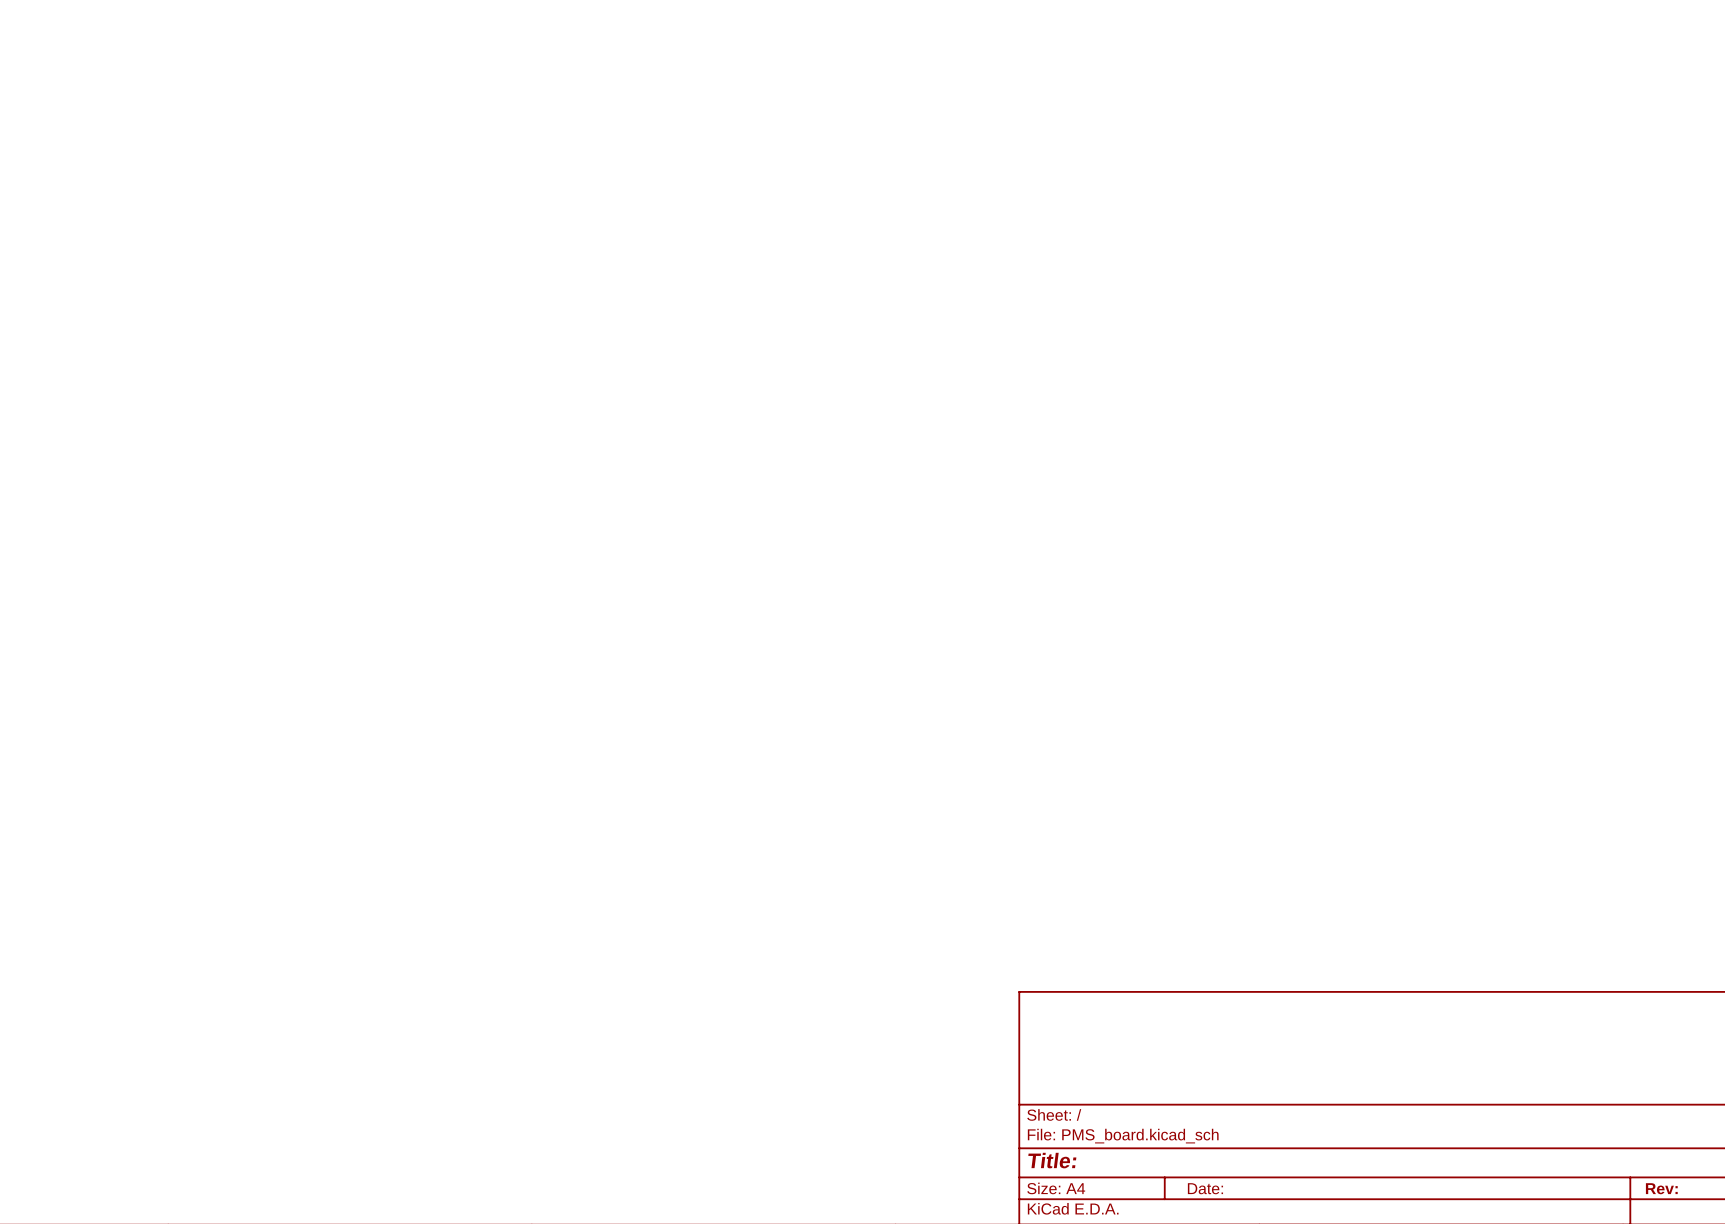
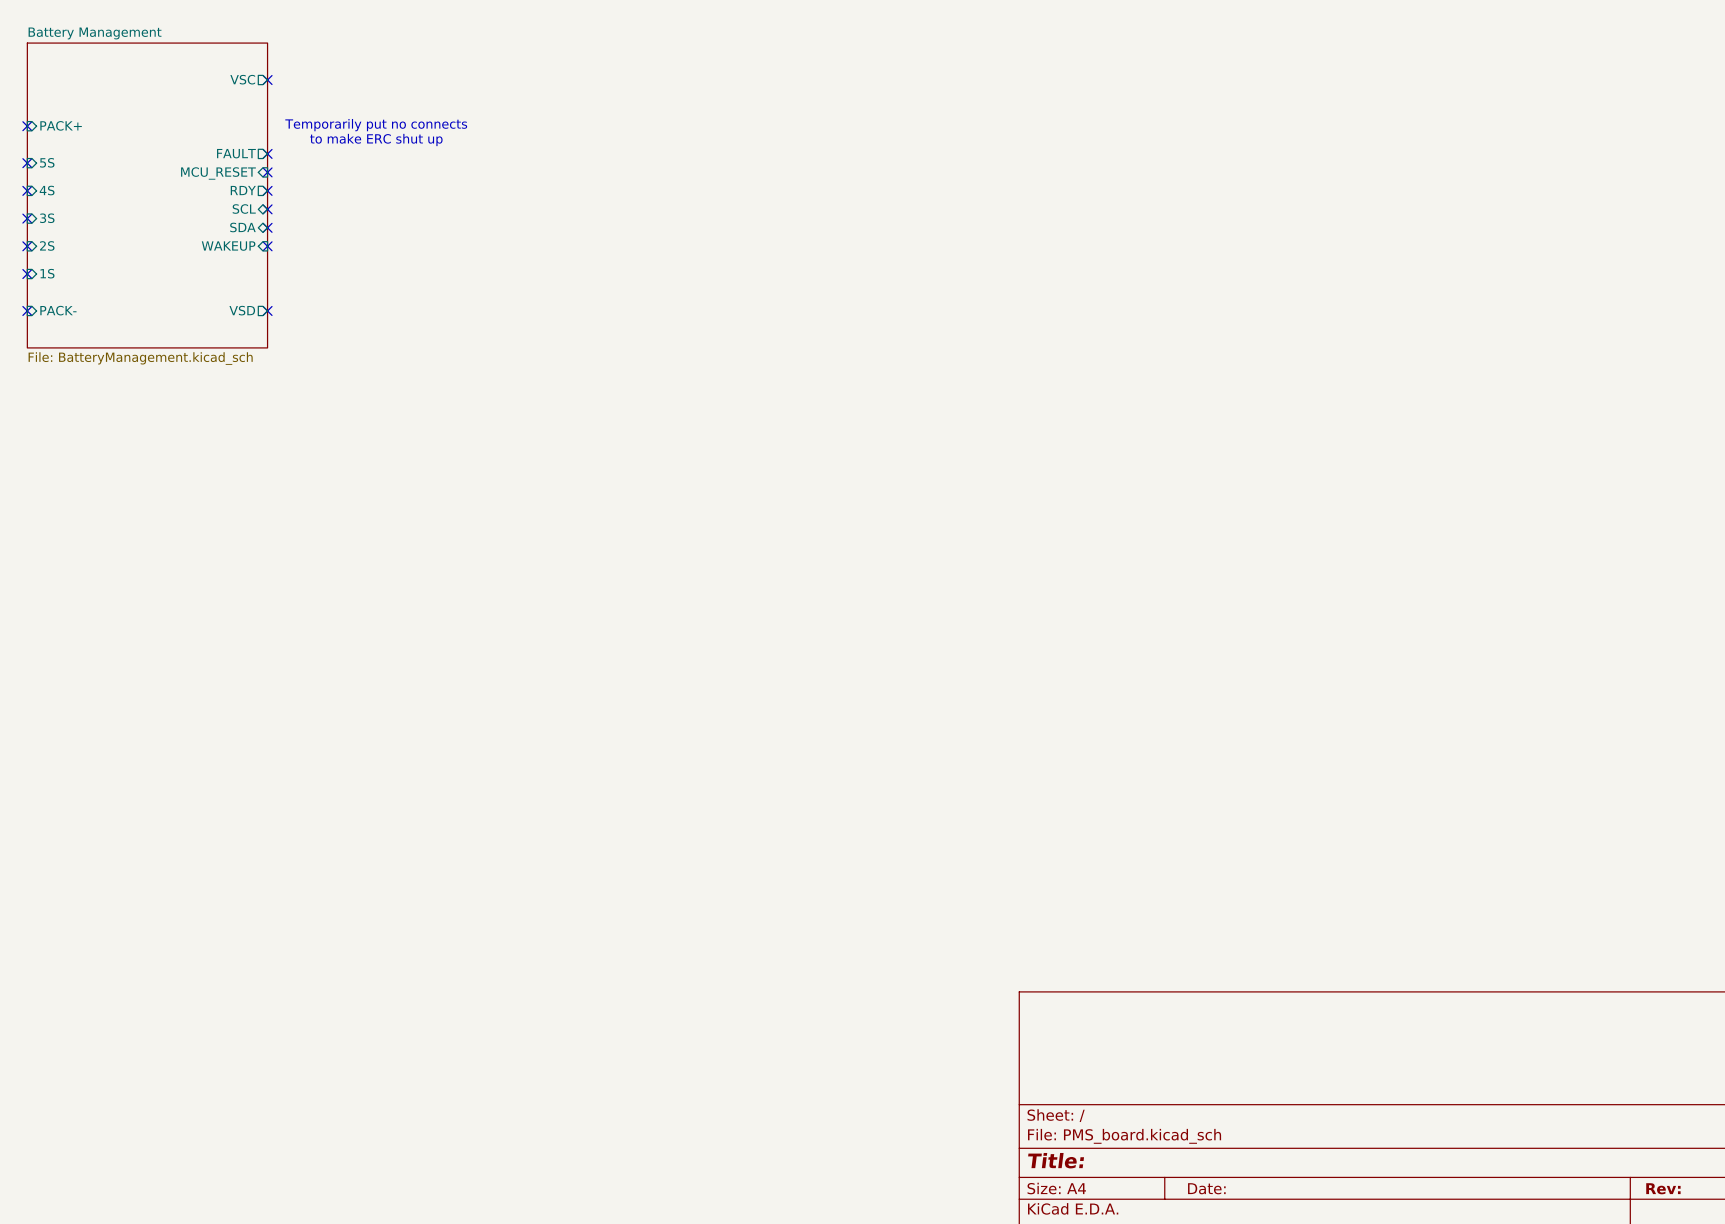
sheet pin: none -> VSC (242, 79)
no-connect mark: none -> (267, 80)
sheet pin: none -> PACK+ (61, 125)
text: none -> Temporarily put no connects (376, 125)
no-connect mark: none -> (27, 126)
text: none -> to make ERC shut up (376, 139)
sheet pin: none -> FAULT (236, 153)
no-connect mark: none -> (267, 153)
sheet pin: none -> 5S (47, 162)
no-connect mark: none -> (27, 163)
no-connect mark: none -> (267, 172)
sheet pin: none -> MCU_RESET (218, 173)
no-connect mark: none -> (27, 190)
sheet pin: none -> 4S (47, 190)
sheet pin: none -> RDY (243, 190)
no-connect mark: none -> (267, 190)
sheet Battery Management: none -> File: BatteryManagement.kicad_sch (147, 195)
sheet pin: none -> SCL (244, 209)
no-connect mark: none -> (267, 209)
no-connect mark: none -> (27, 218)
sheet pin: none -> 3S (47, 218)
sheet pin: none -> SDA (242, 227)
no-connect mark: none -> (267, 227)
sheet pin: none -> 2S (47, 245)
no-connect mark: none -> (27, 246)
sheet pin: none -> WAKEUP (228, 246)
no-connect mark: none -> (267, 246)
sheet pin: none -> 1S (47, 273)
no-connect mark: none -> (27, 274)
no-connect mark: none -> (27, 310)
sheet pin: none -> PACK- (58, 310)
sheet pin: none -> VSD (242, 310)
no-connect mark: none -> (267, 310)

